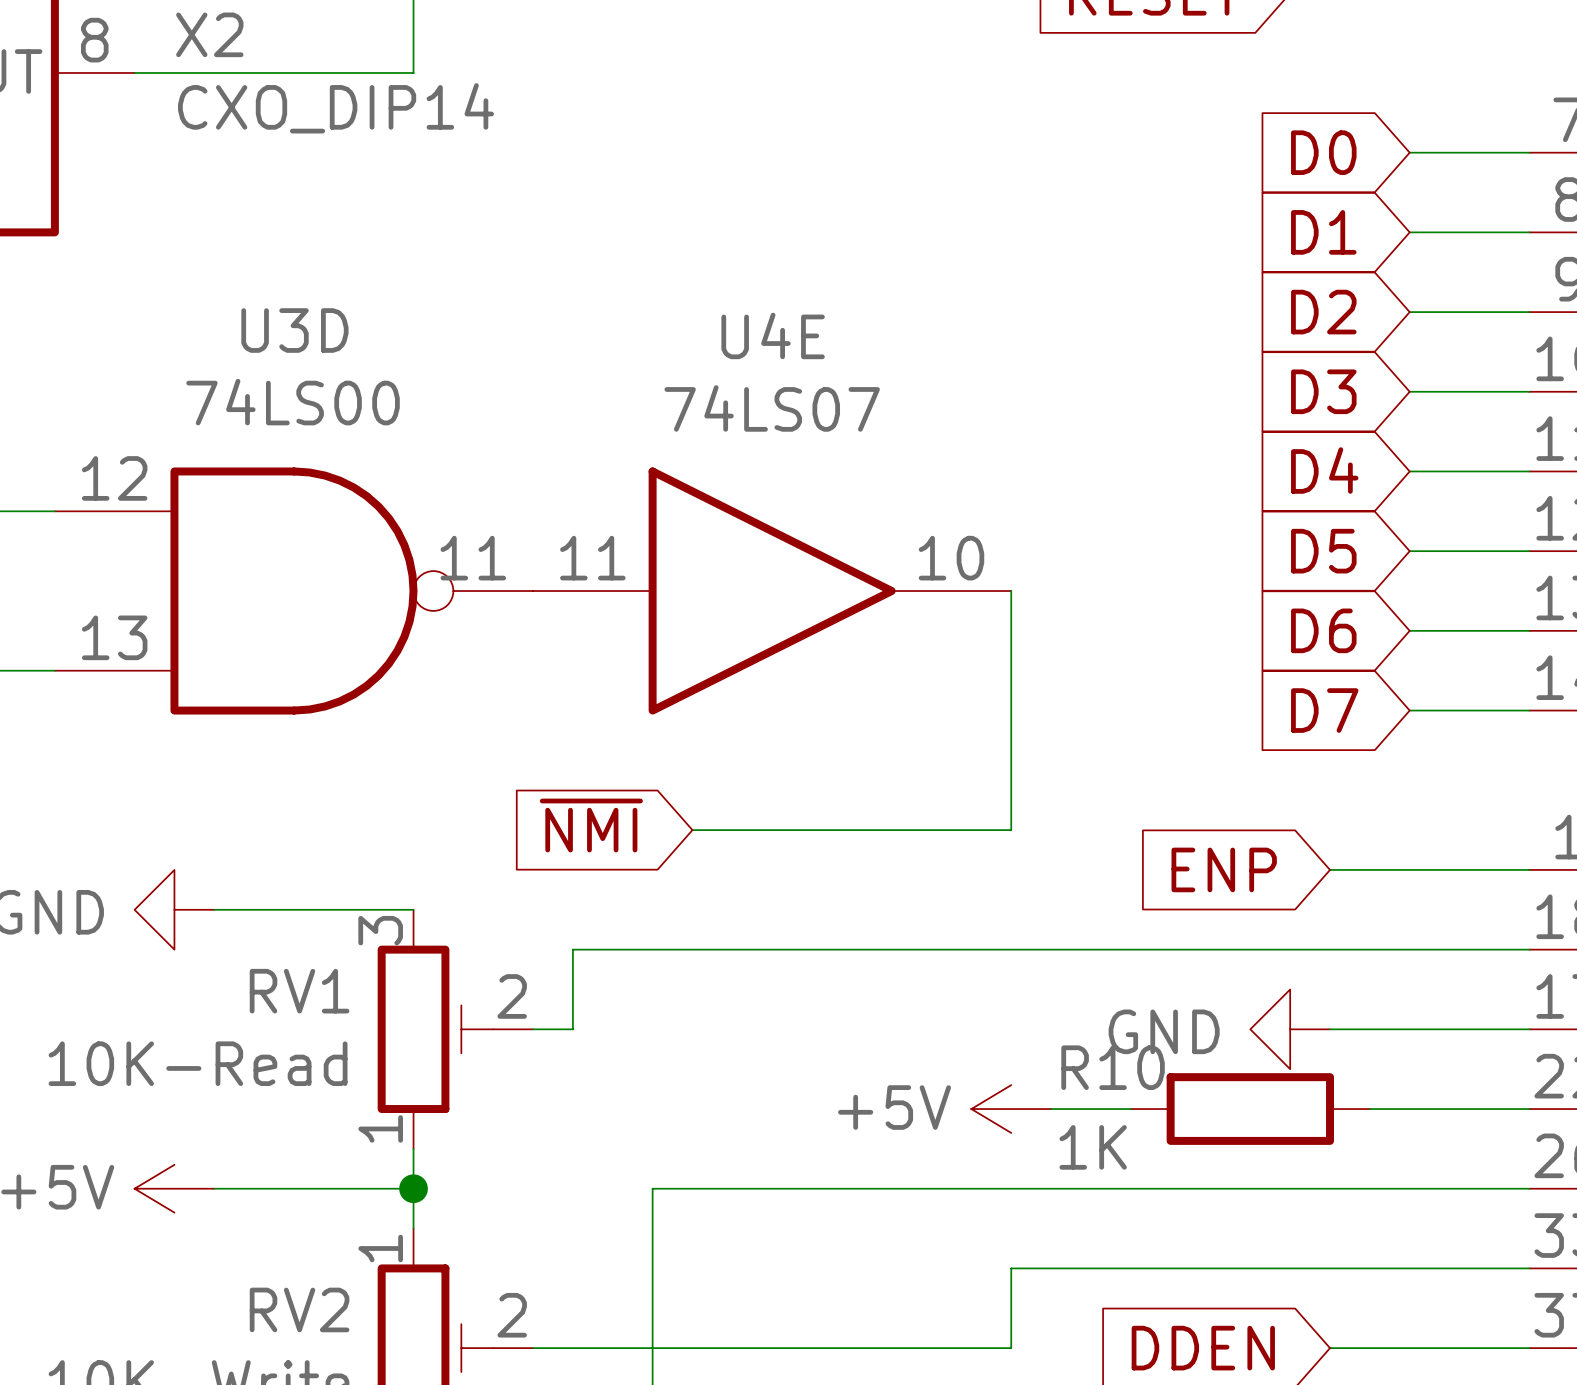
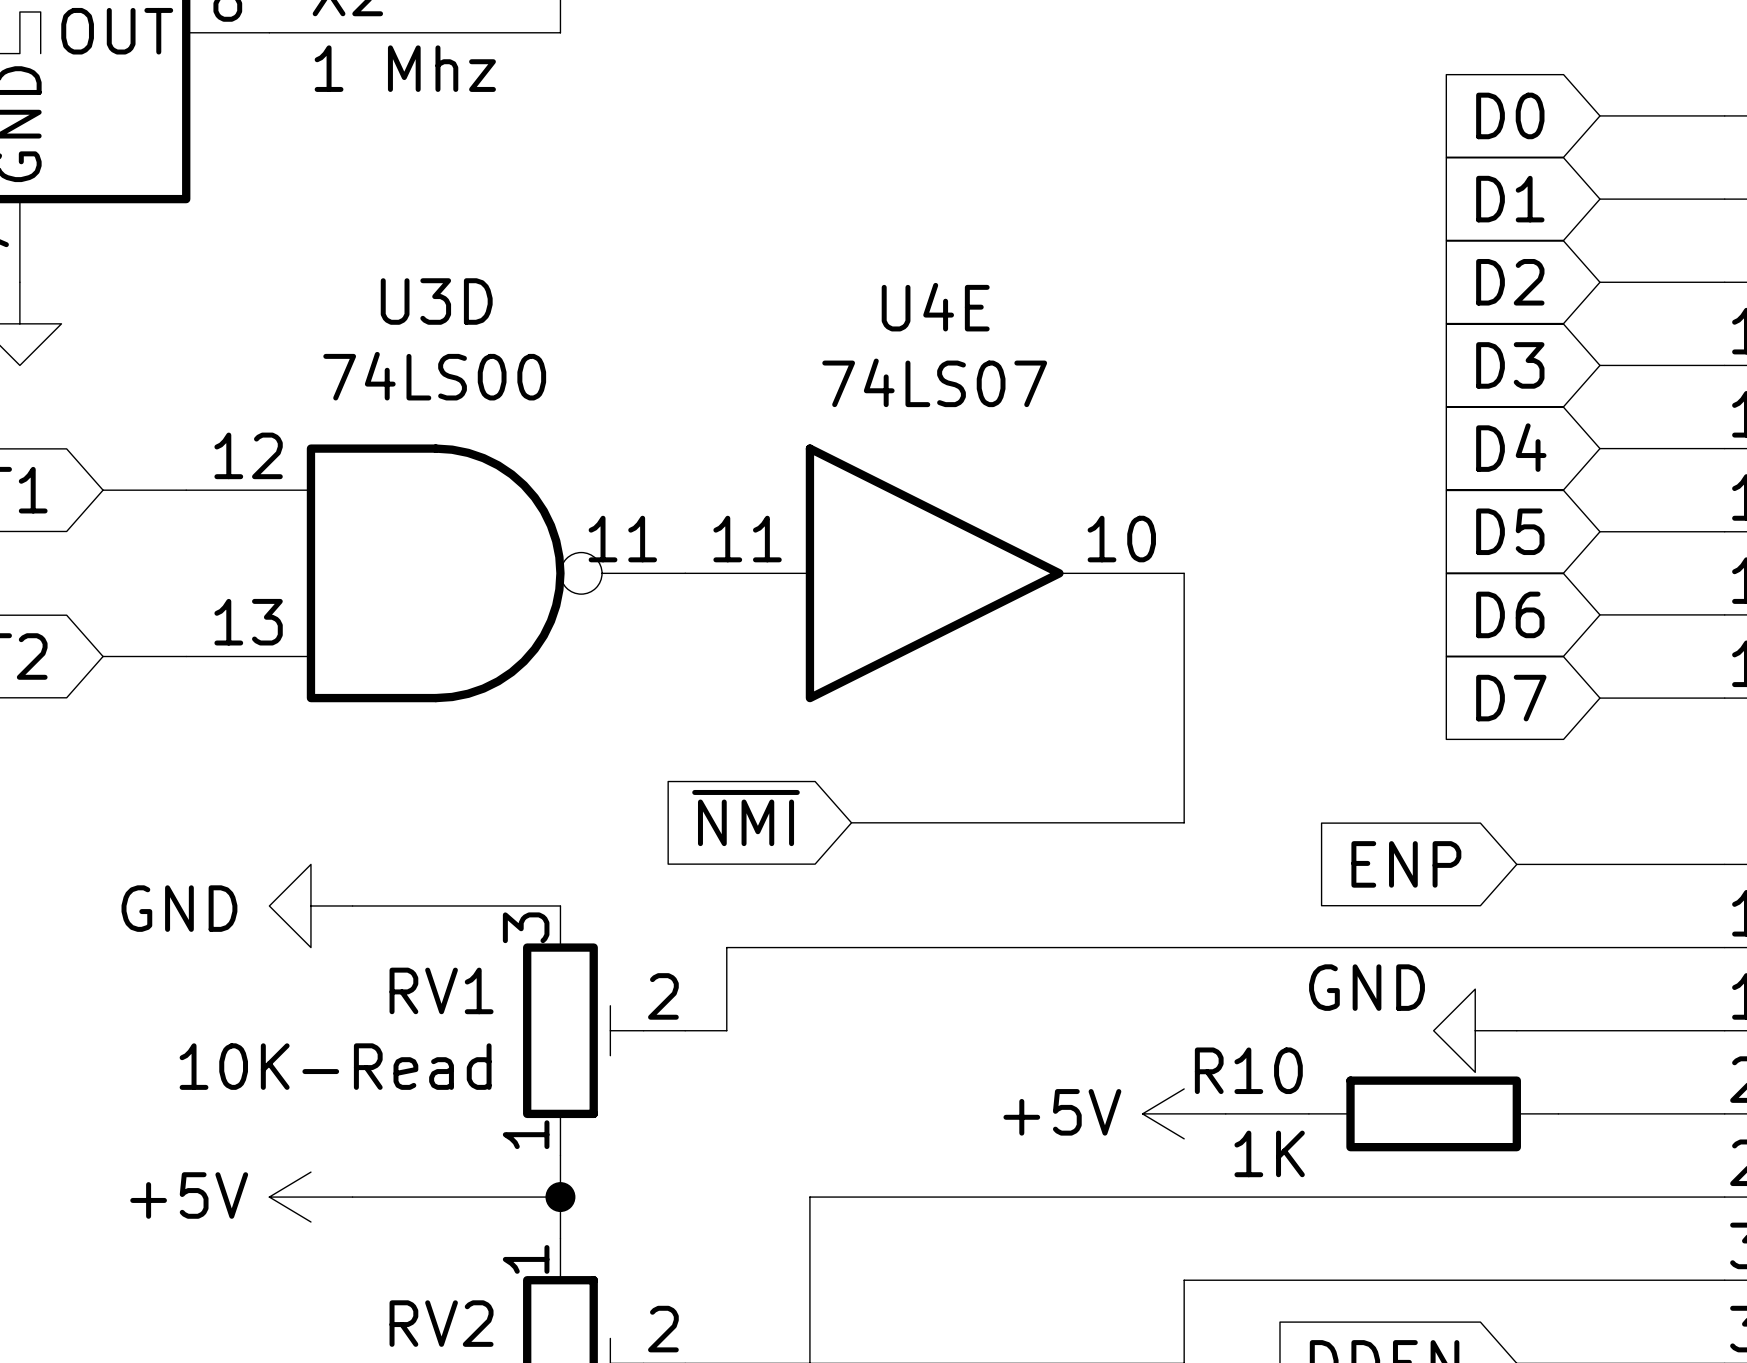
X2 value: CXO_DIP14 (335, 108) -> 1 Mhz (405, 68)
power symbol text position: GND (1164, 1031) -> GND (1367, 987)
R10 name position: R10 (1113, 1067) -> R10 (1248, 1070)

